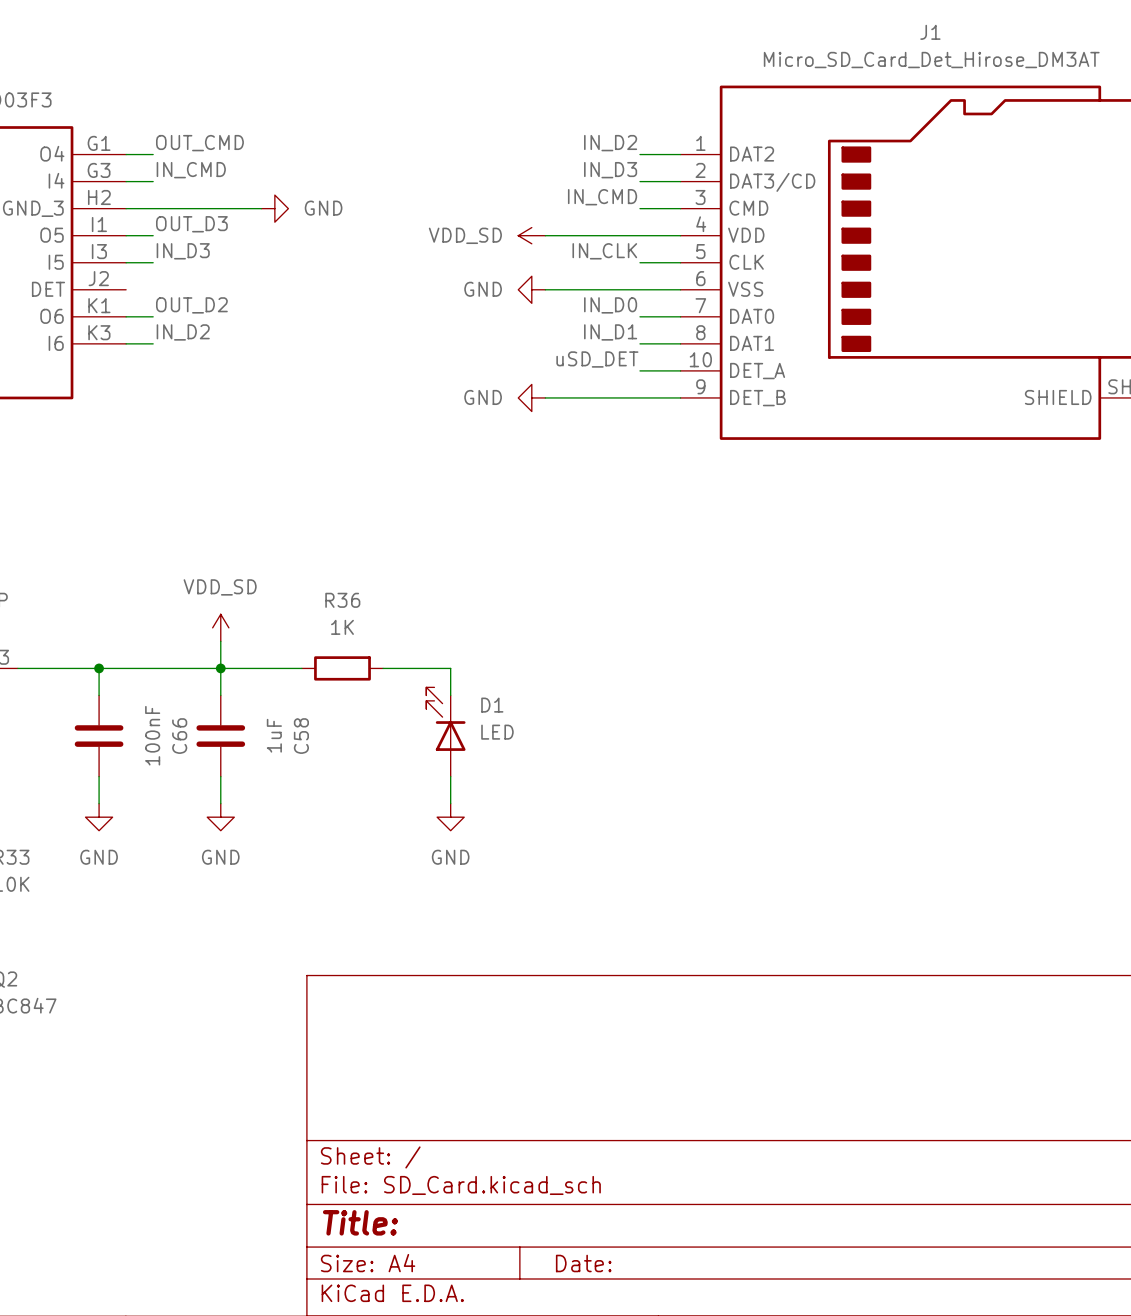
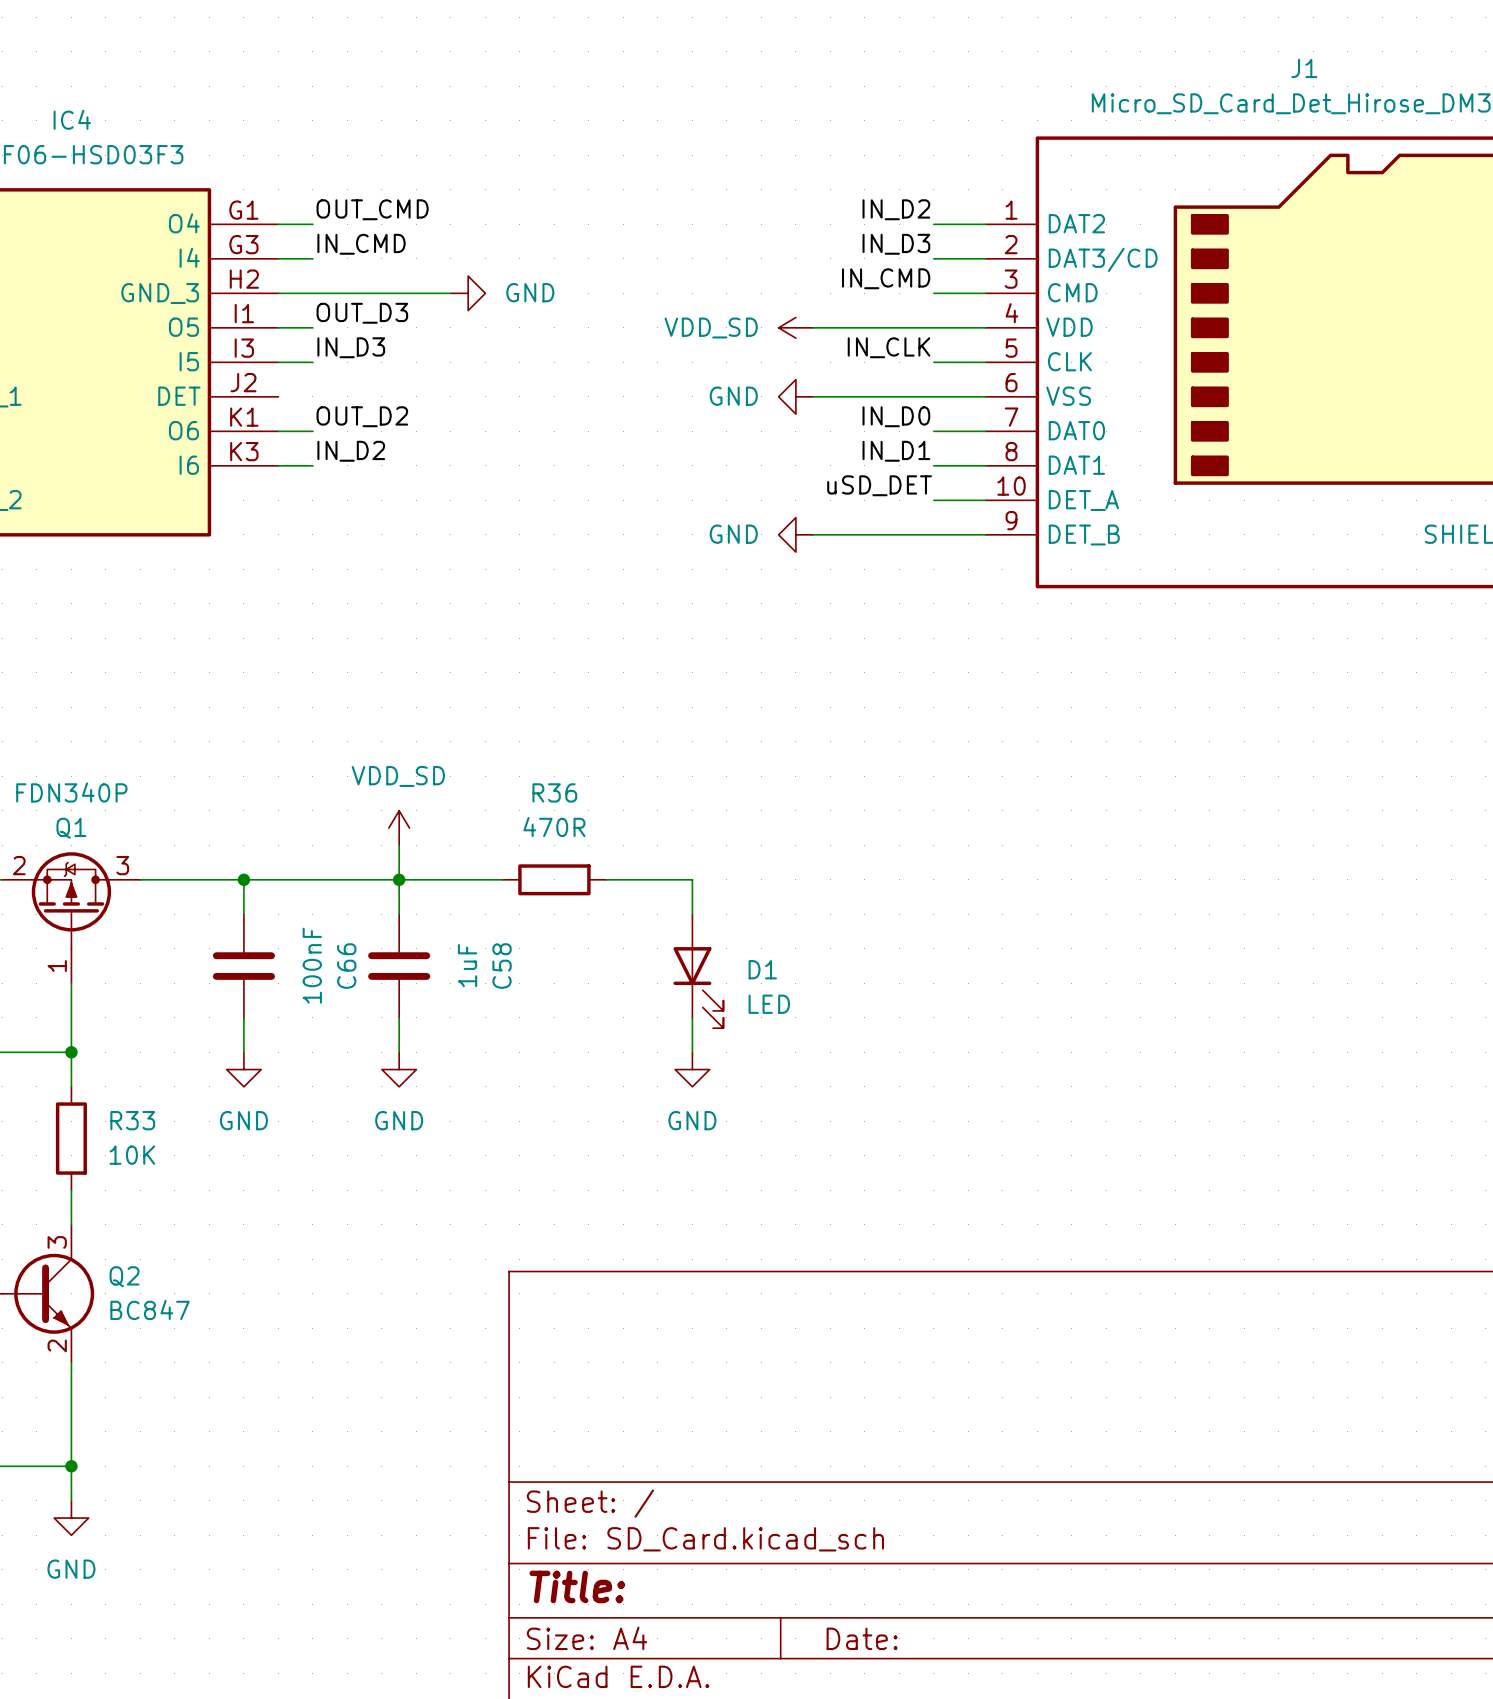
R36 value: 1K (342, 627) -> 470R (554, 827)
D1 name position: D1 (492, 705) -> D1 (762, 969)
D1 rotation: 0° (445, 719) -> 180° (698, 987)
D1 value position: LED (497, 732) -> LED (769, 1004)

